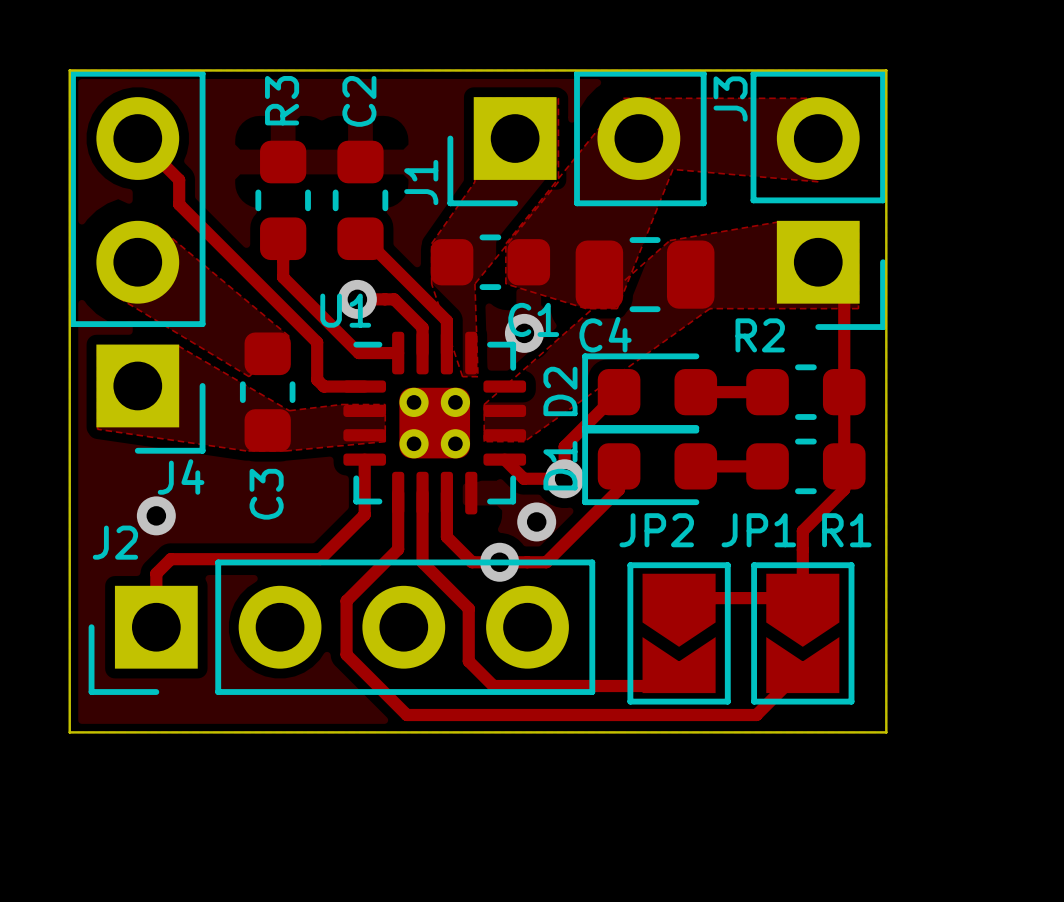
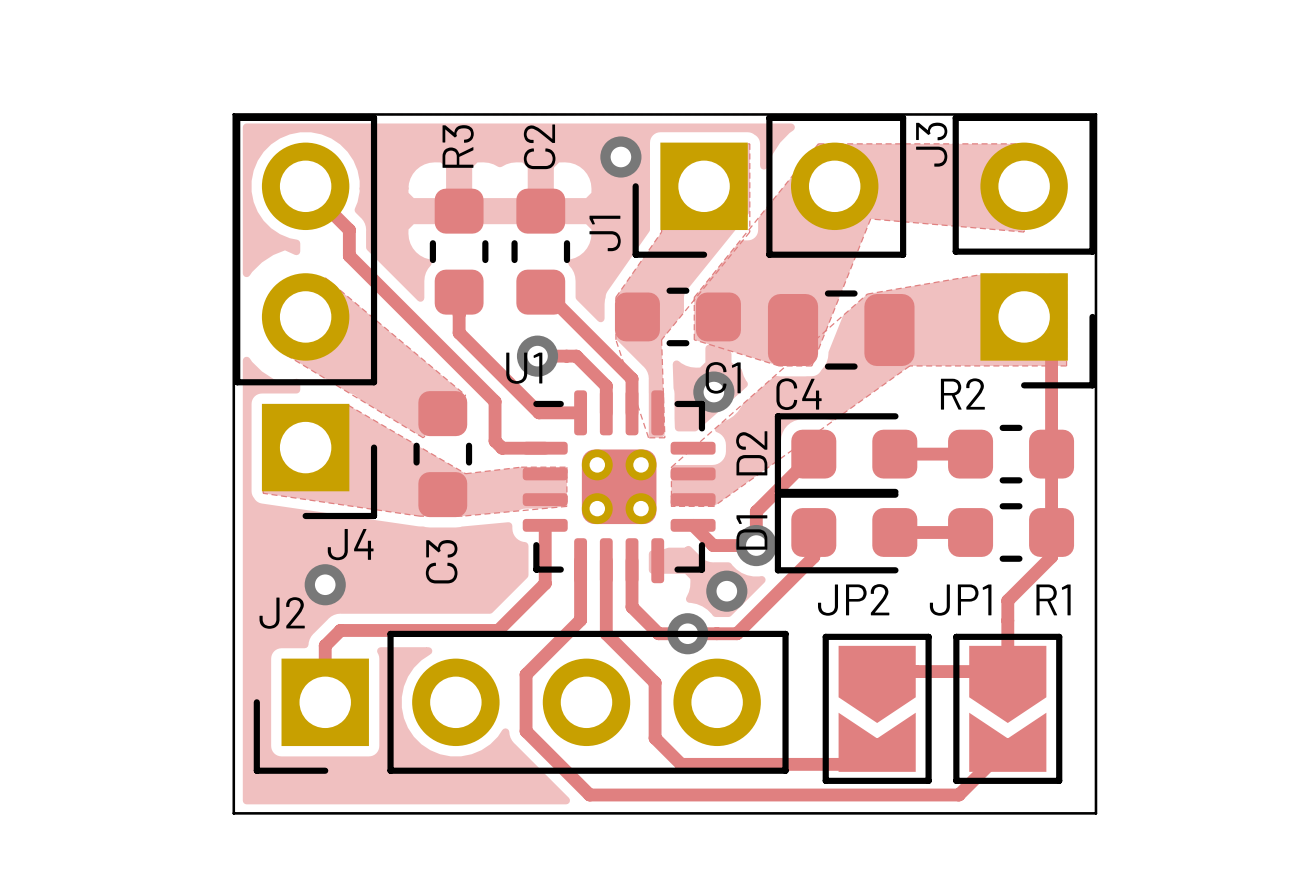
via: none -> (620, 157)

